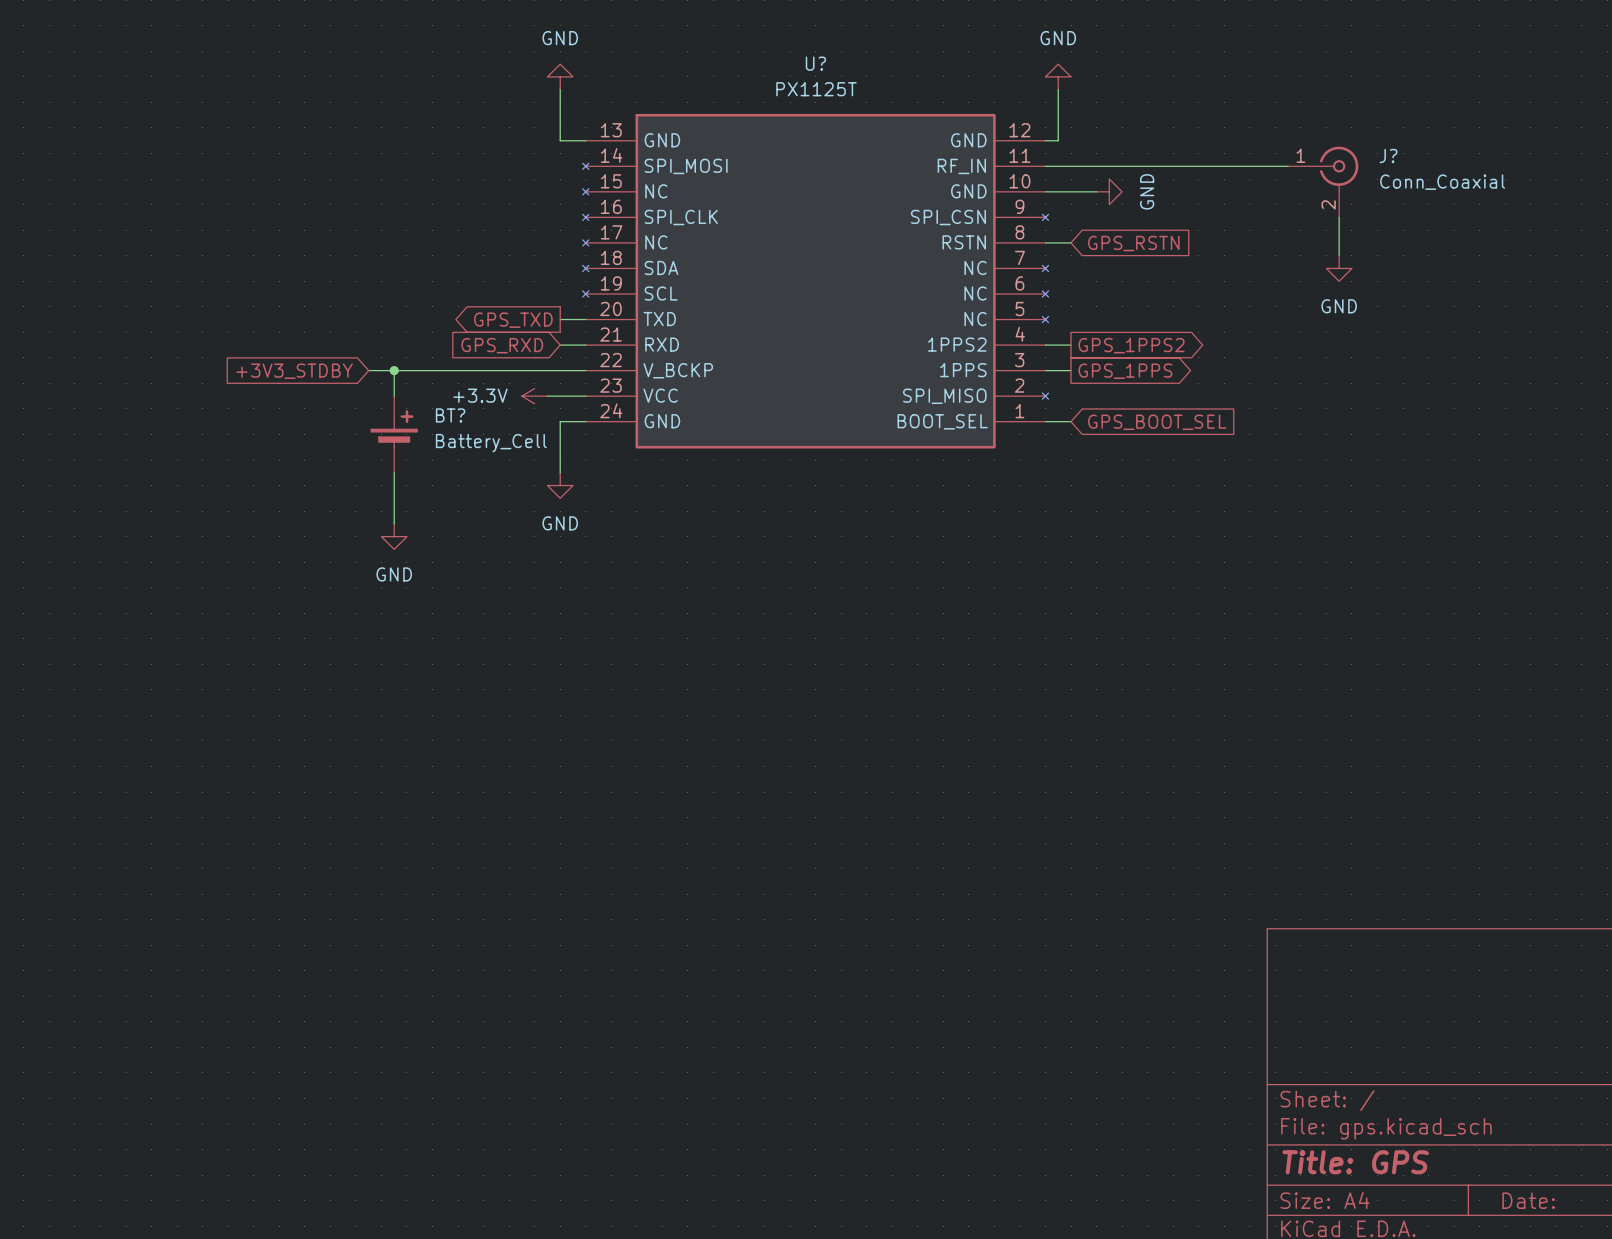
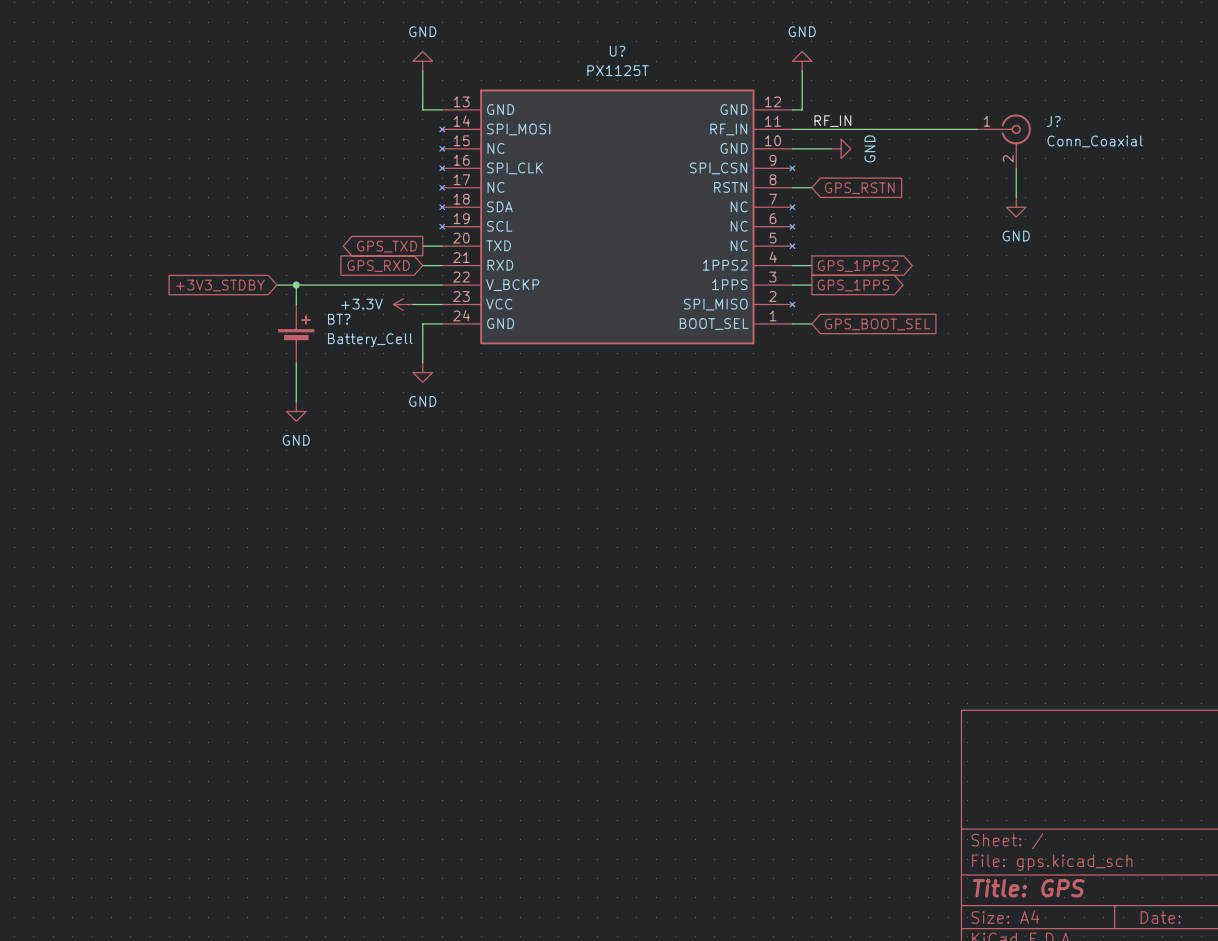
label: none -> RF_IN (832, 121)

